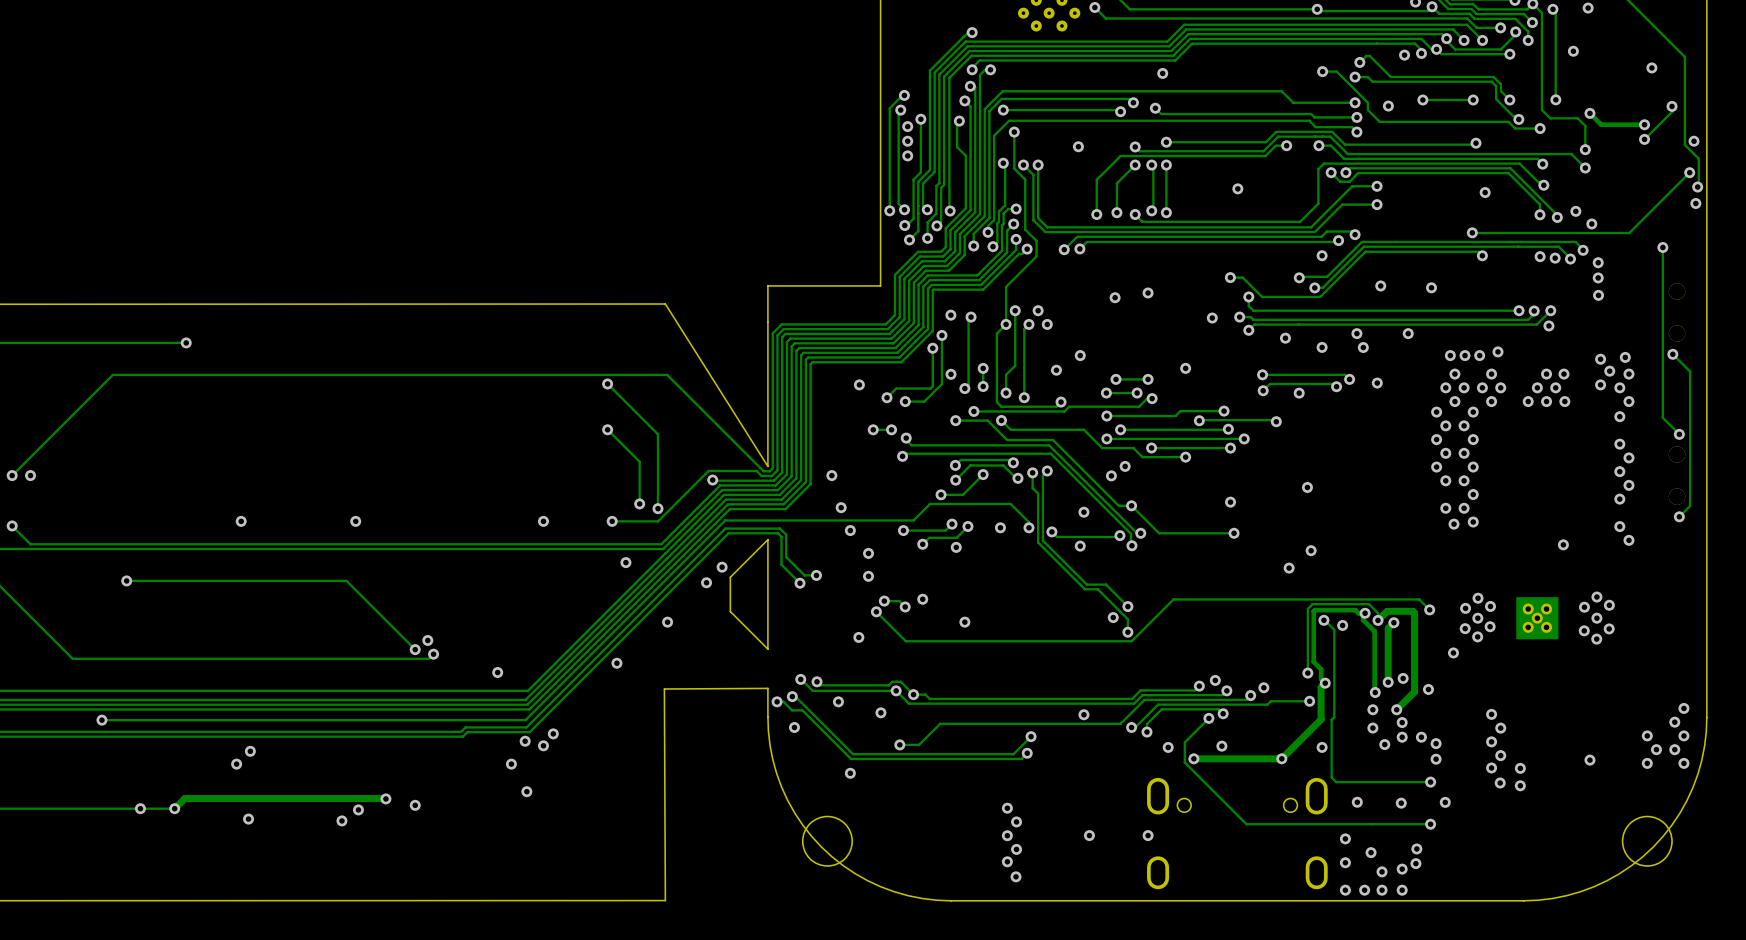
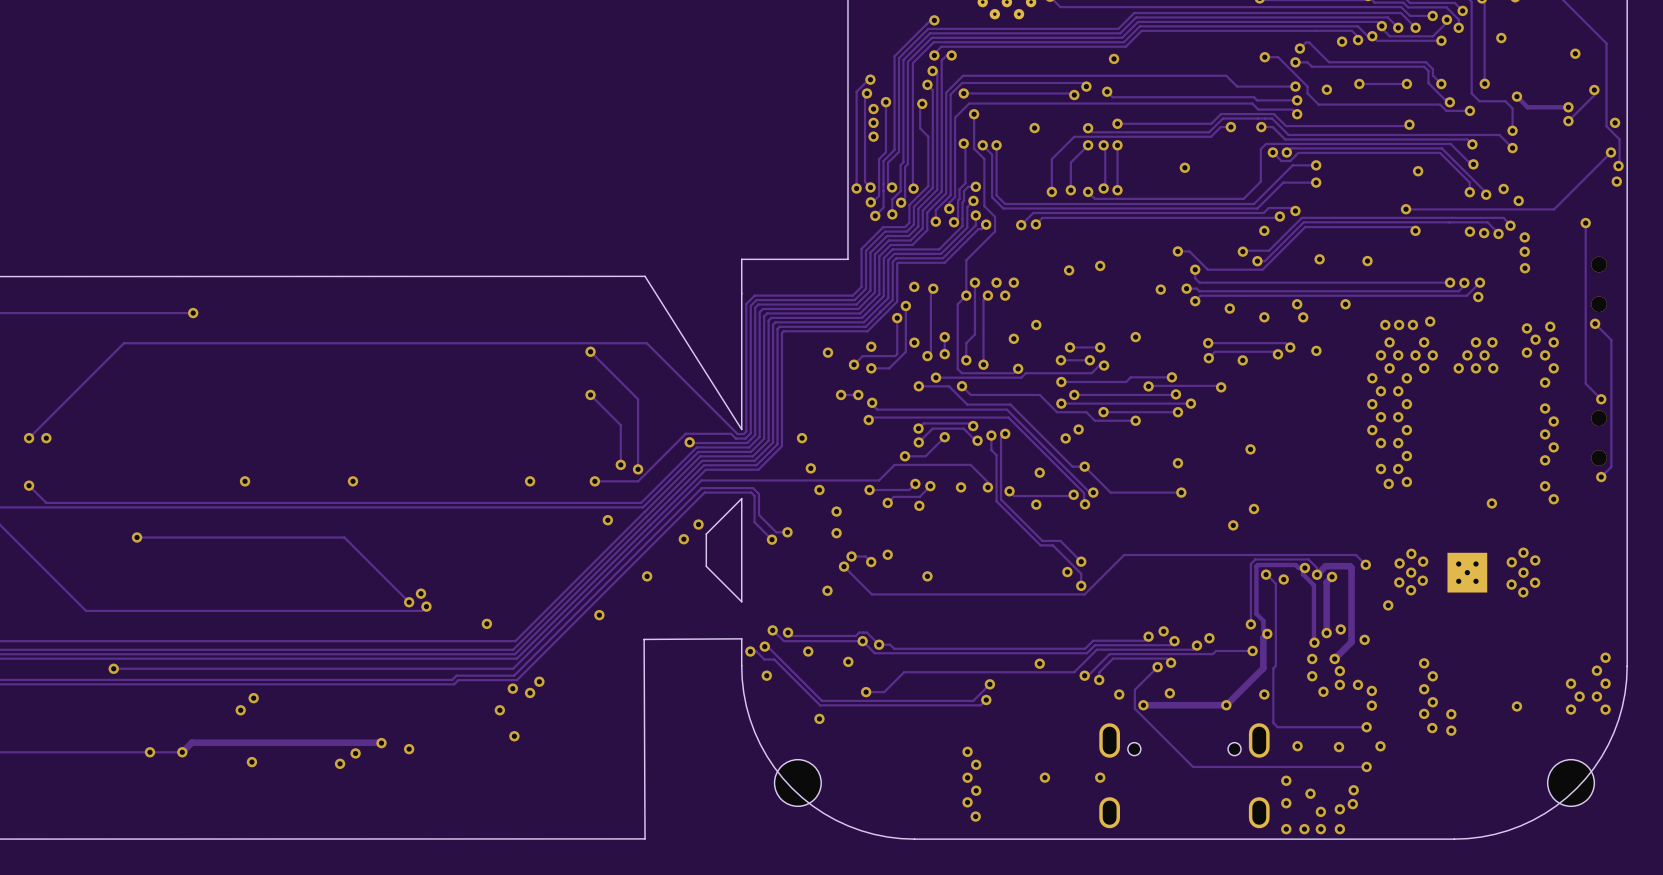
via: none -> (1013, 282)
via: none -> (871, 346)

